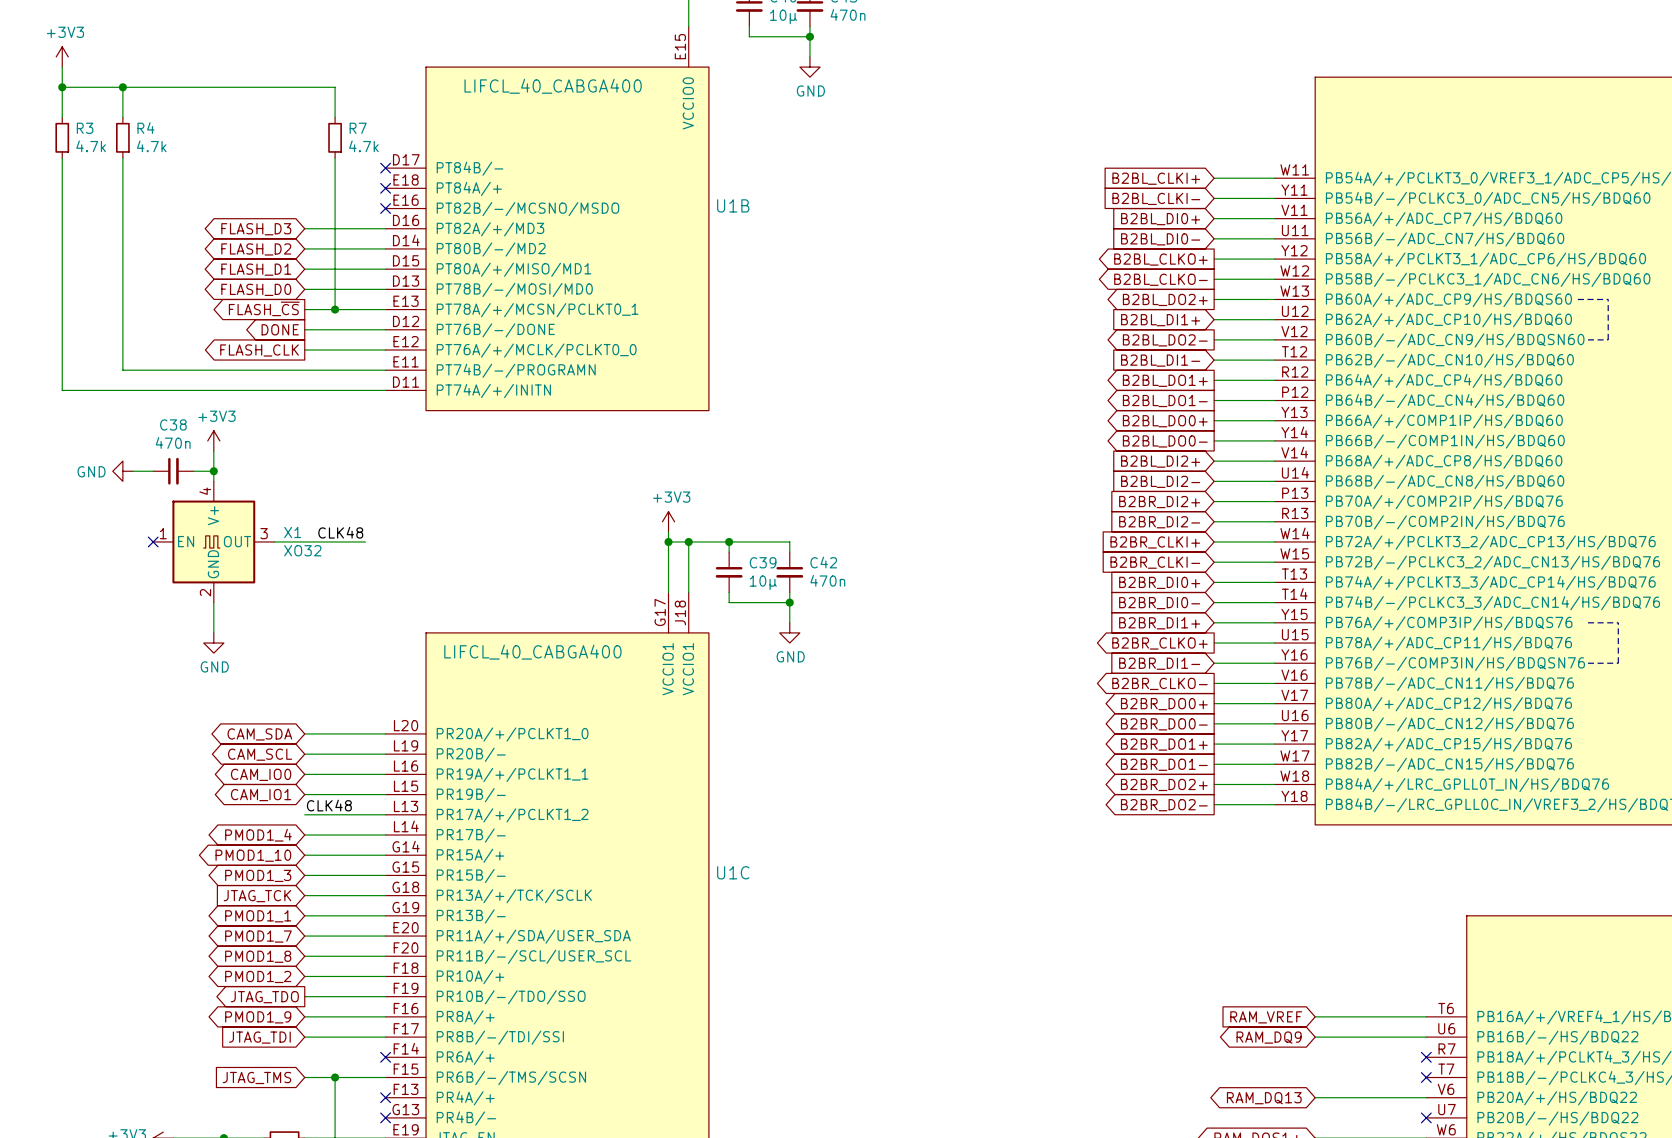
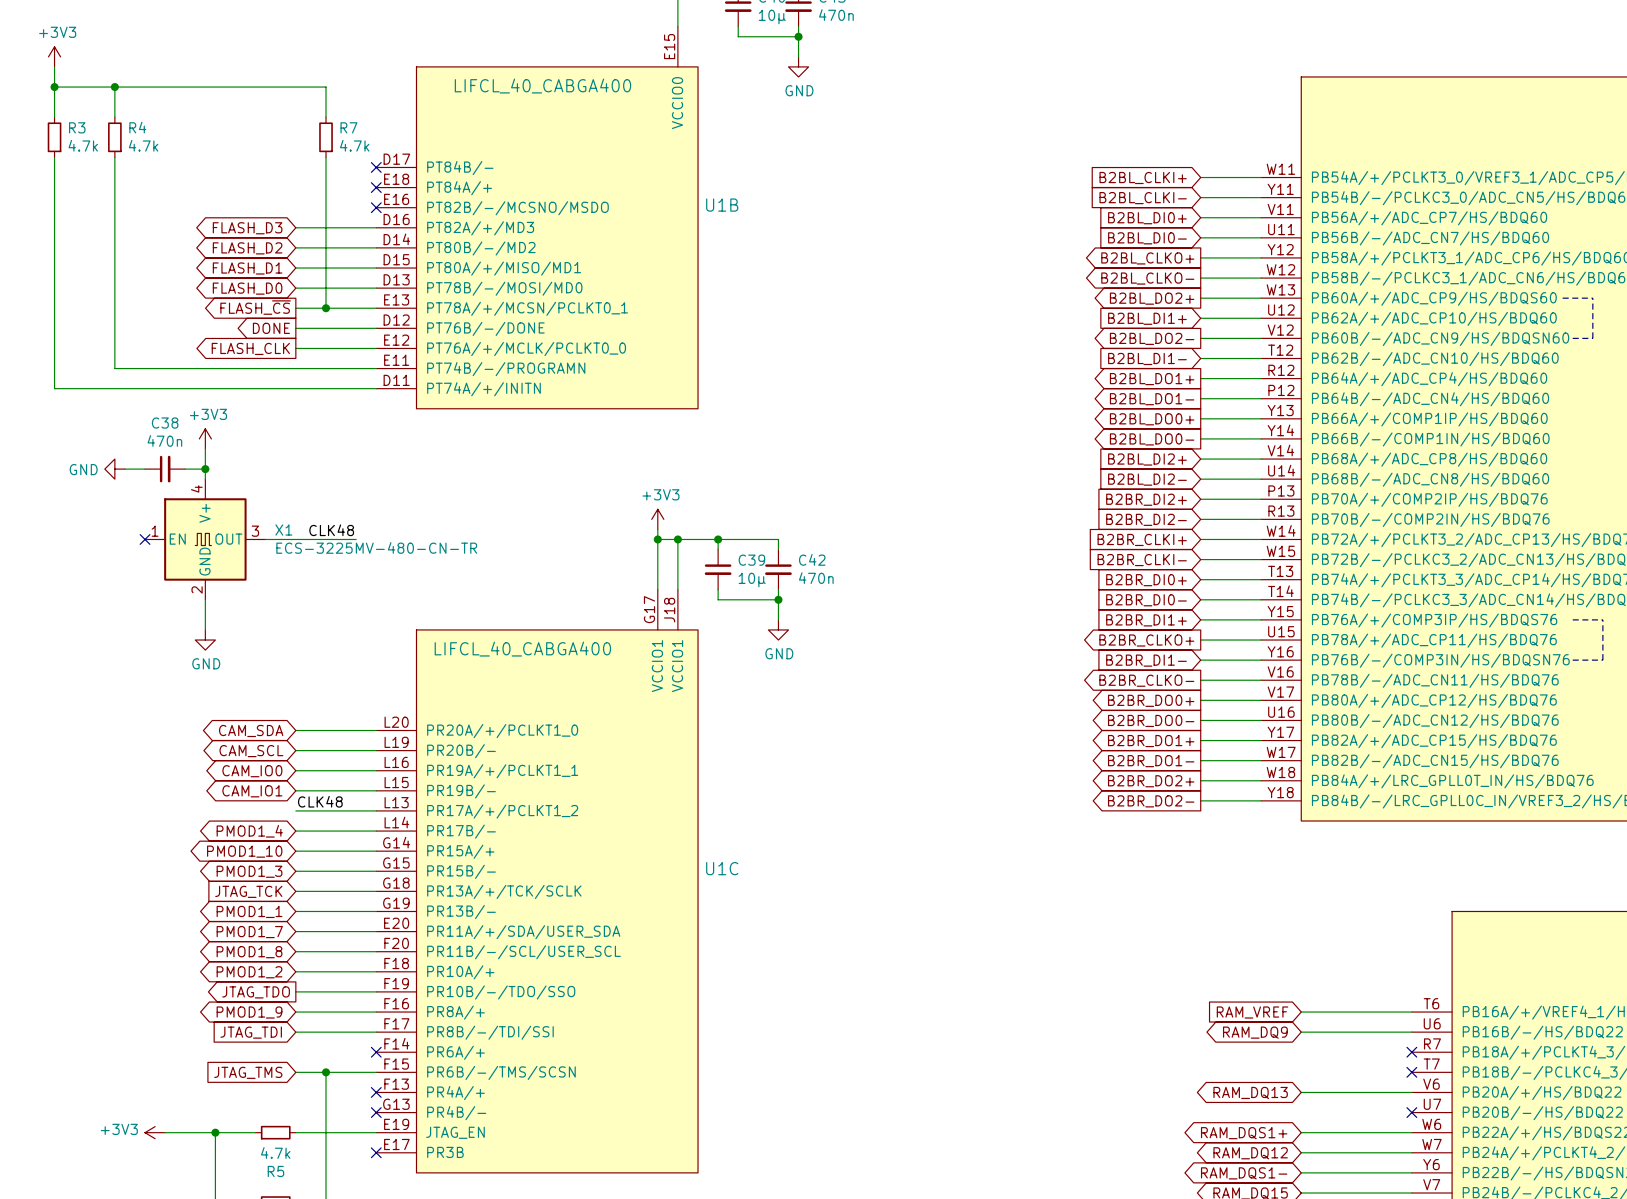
X1 value: XO32 (302, 550) -> ECS-3225MV-480-CN-TR (376, 547)

